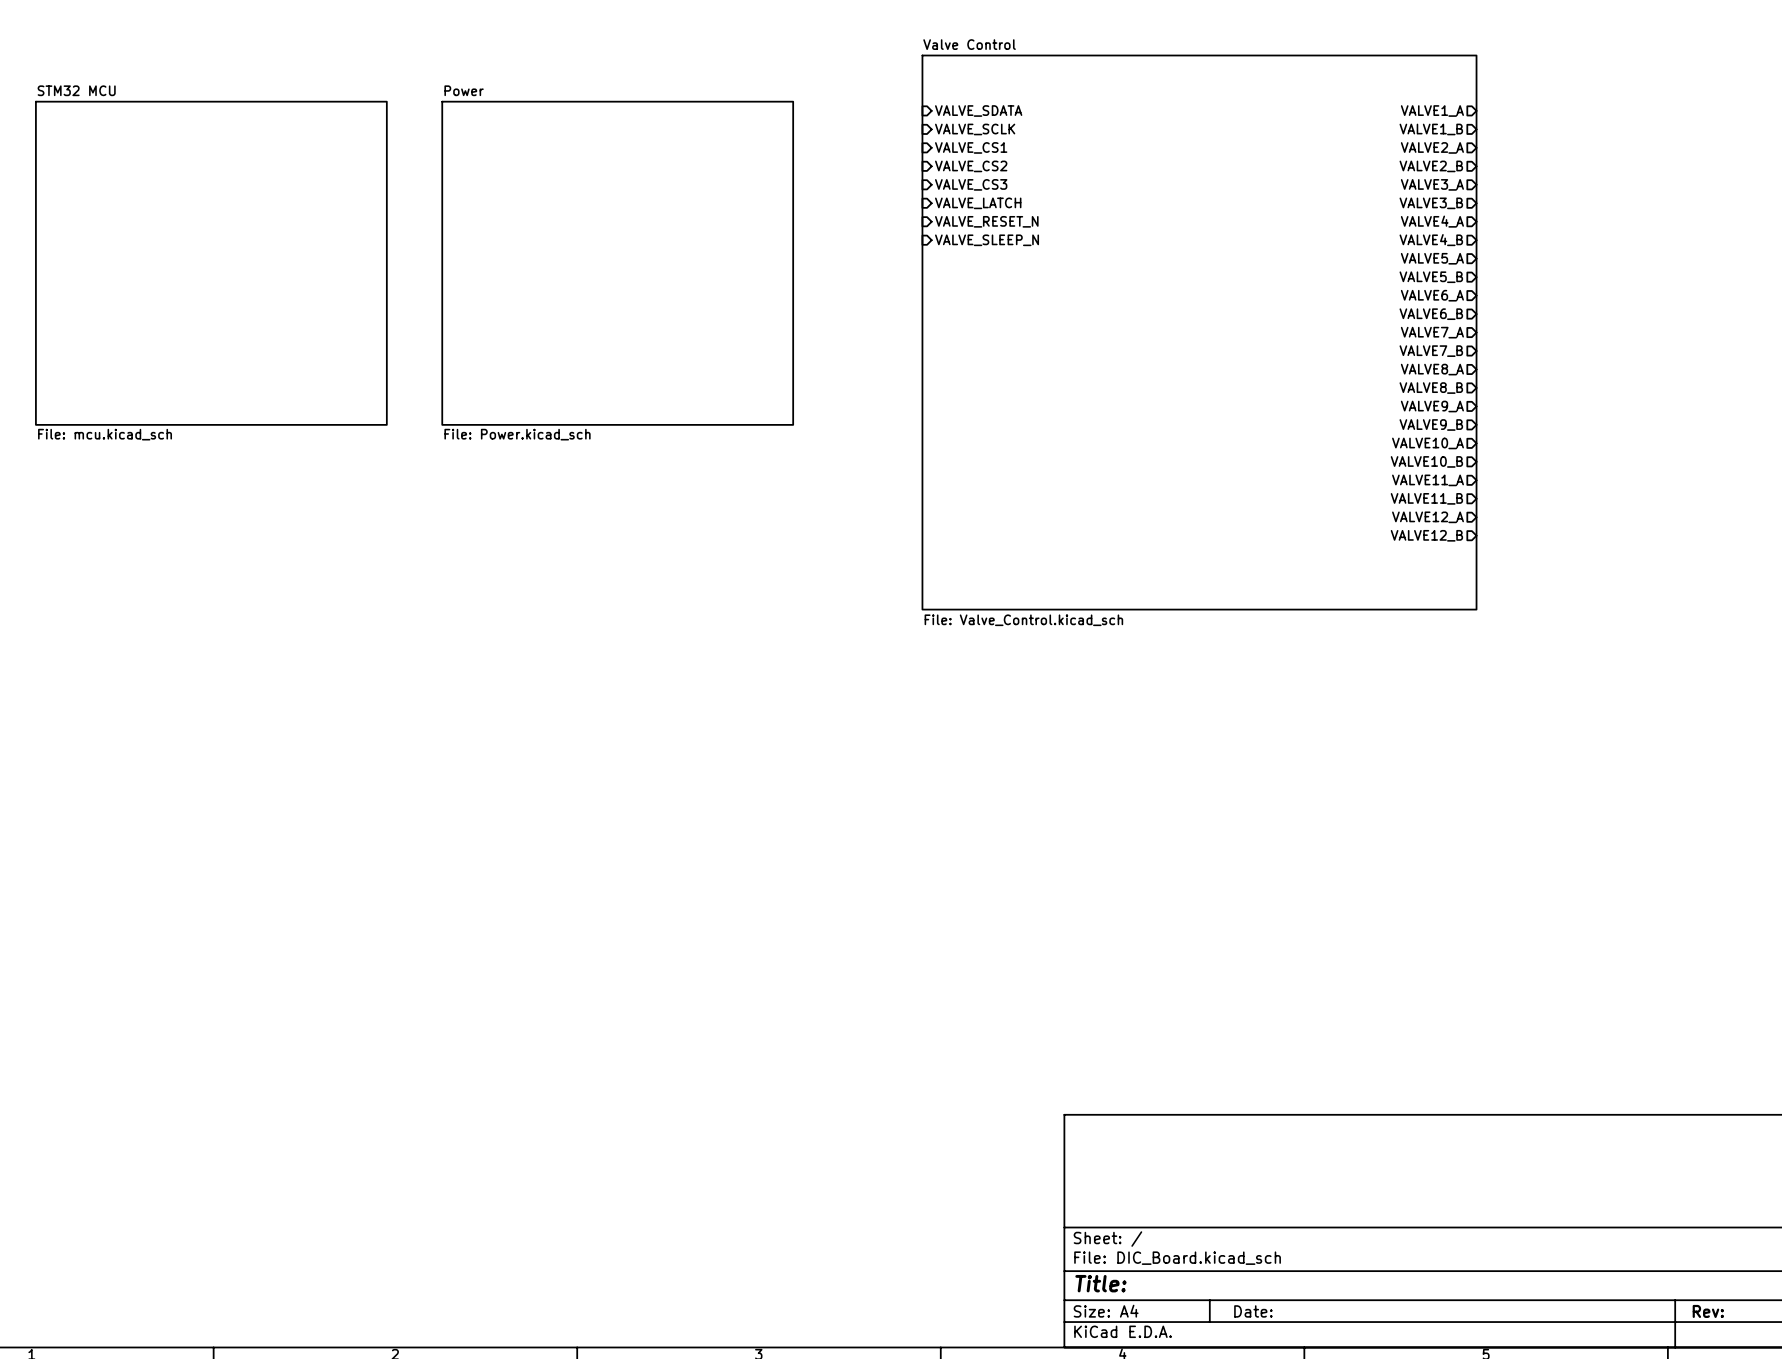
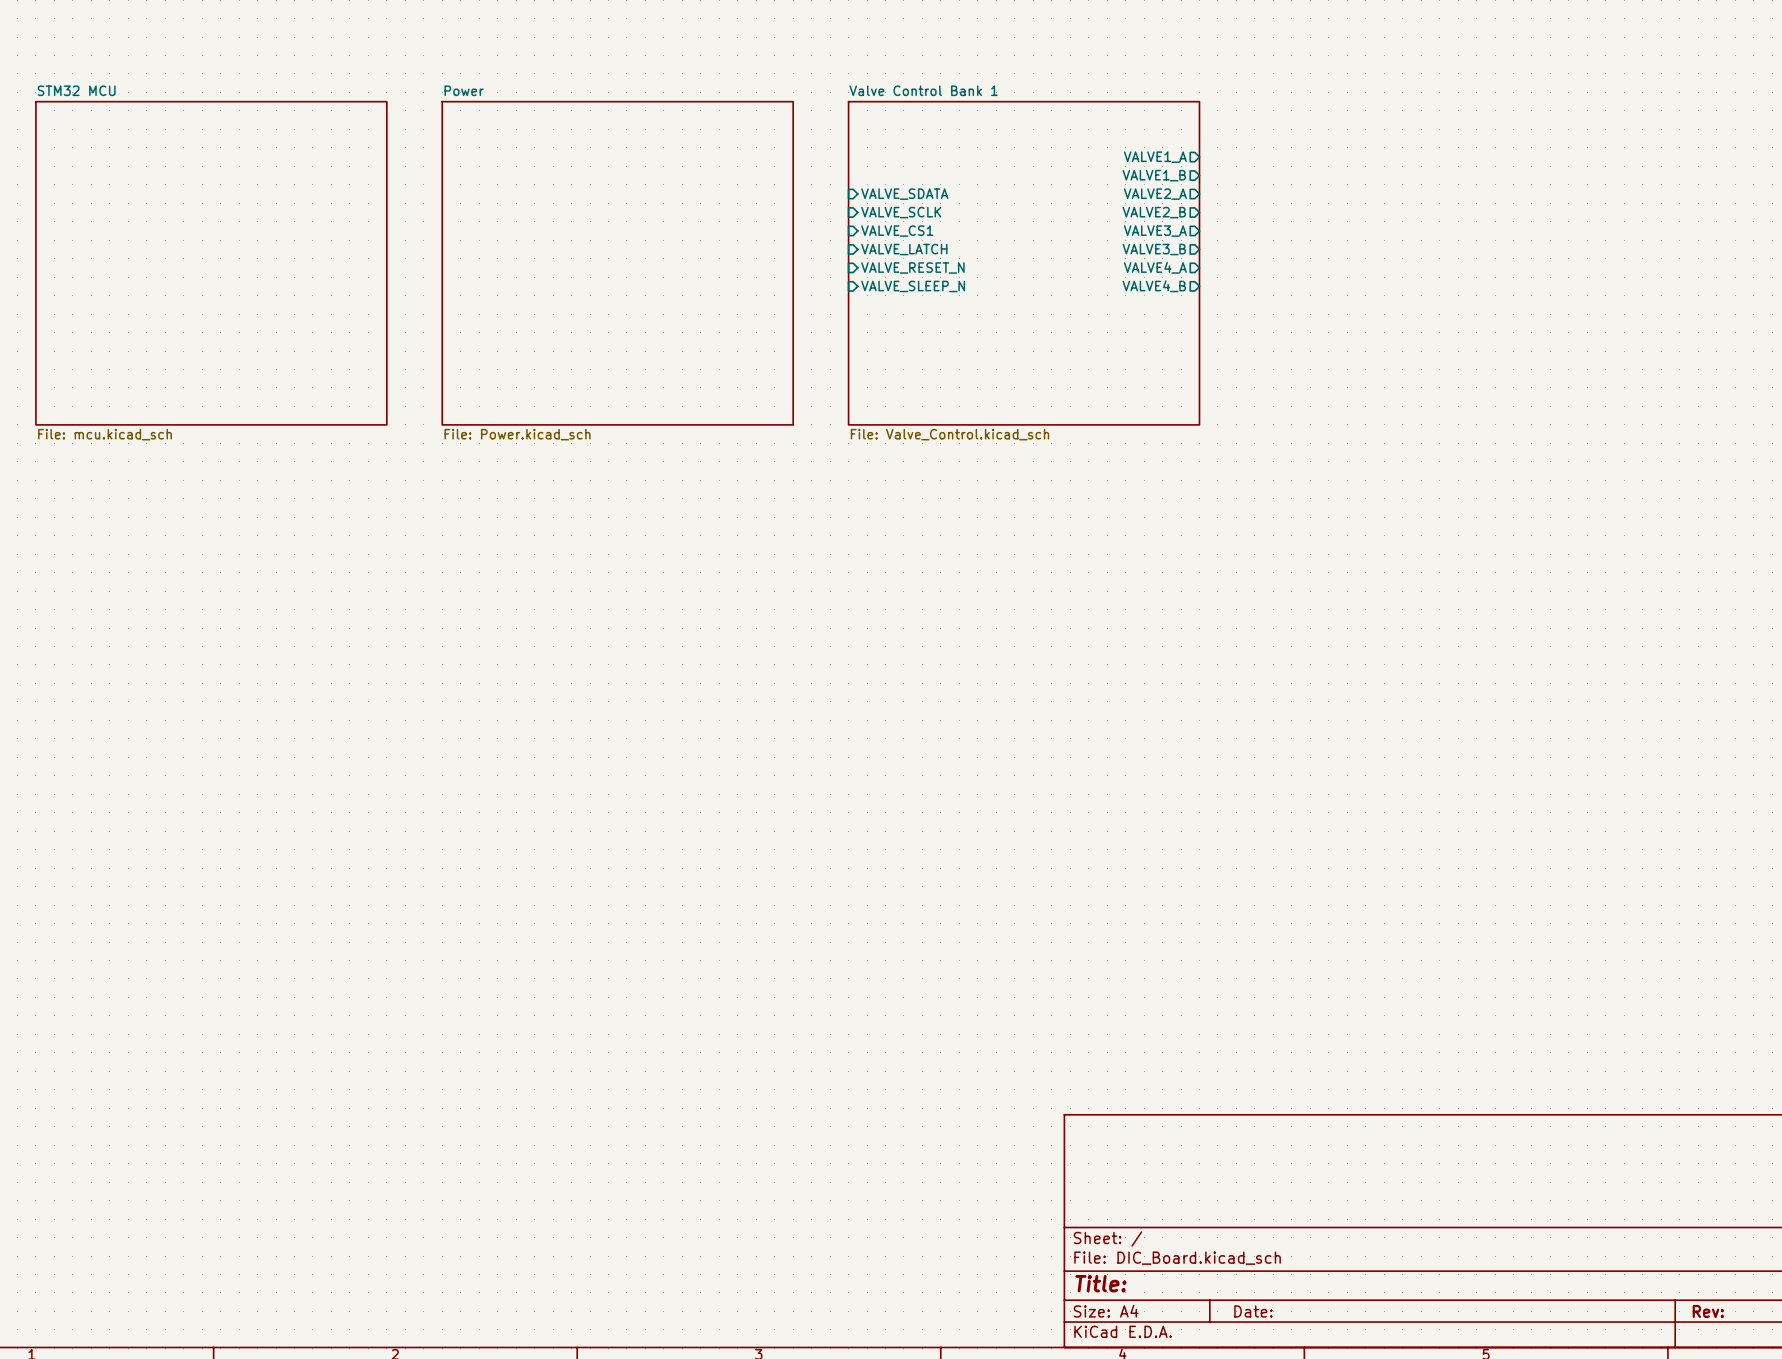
sheet pin position: VALVE_SDATA (978, 111) -> VALVE_SDATA (904, 194)
sheet pin: VALVE1_A (1432, 111) -> none
sheet pin position: VALVE_SCLK (975, 129) -> VALVE_SCLK (901, 212)
sheet pin: VALVE1_B (1431, 129) -> none
sheet pin position: VALVE_CS1 (971, 147) -> VALVE_CS1 (897, 231)
sheet pin: VALVE2_A (1432, 147) -> none
sheet pin: none -> VALVE1_A (1155, 157)
sheet pin: VALVE_CS2 (971, 166) -> none
sheet pin: VALVE2_B (1431, 166) -> none
sheet pin: none -> VALVE1_B (1154, 175)
sheet pin: VALVE_CS3 (971, 184) -> none
sheet pin: VALVE3_A (1432, 184) -> none
sheet pin: none -> VALVE2_A (1155, 194)
sheet pin position: VALVE_LATCH (978, 203) -> VALVE_LATCH (904, 249)
sheet pin: VALVE3_B (1431, 203) -> none
sheet pin: none -> VALVE2_B (1154, 212)
sheet pin position: VALVE_RESET_N (986, 221) -> VALVE_RESET_N (912, 267)
sheet pin: VALVE4_A (1432, 221) -> none
sheet pin: none -> VALVE3_A (1155, 231)
sheet pin position: VALVE_SLEEP_N (987, 240) -> VALVE_SLEEP_N (913, 286)
sheet pin: VALVE4_B (1431, 240) -> none
sheet pin: none -> VALVE3_B (1154, 249)
sheet pin: VALVE5_A (1432, 258) -> none
sheet Valve Control Bank 1: none -> File: Valve_Control.kicad_sch (1024, 263)
sheet pin: none -> VALVE4_A (1155, 267)
sheet pin: VALVE5_B (1431, 277) -> none
sheet pin: none -> VALVE4_B (1154, 286)
sheet pin: VALVE6_A (1432, 295) -> none
sheet pin: VALVE6_B (1431, 314) -> none
sheet Valve Control: File: Valve_Control.kicad_sch (1199, 332) -> none
sheet pin: VALVE7_A (1432, 332) -> none
sheet pin: VALVE7_B (1431, 351) -> none
sheet pin: VALVE8_A (1432, 369) -> none
sheet pin: VALVE8_B (1431, 388) -> none
sheet pin: VALVE9_A (1432, 406) -> none
sheet pin: VALVE9_B (1431, 424) -> none
sheet pin: VALVE10_A (1428, 443) -> none
sheet pin: VALVE10_B (1426, 461) -> none
sheet pin: VALVE11_A (1428, 480) -> none
sheet pin: VALVE11_B (1426, 498) -> none
sheet pin: VALVE12_A (1428, 517) -> none
sheet pin: VALVE12_B (1426, 535) -> none

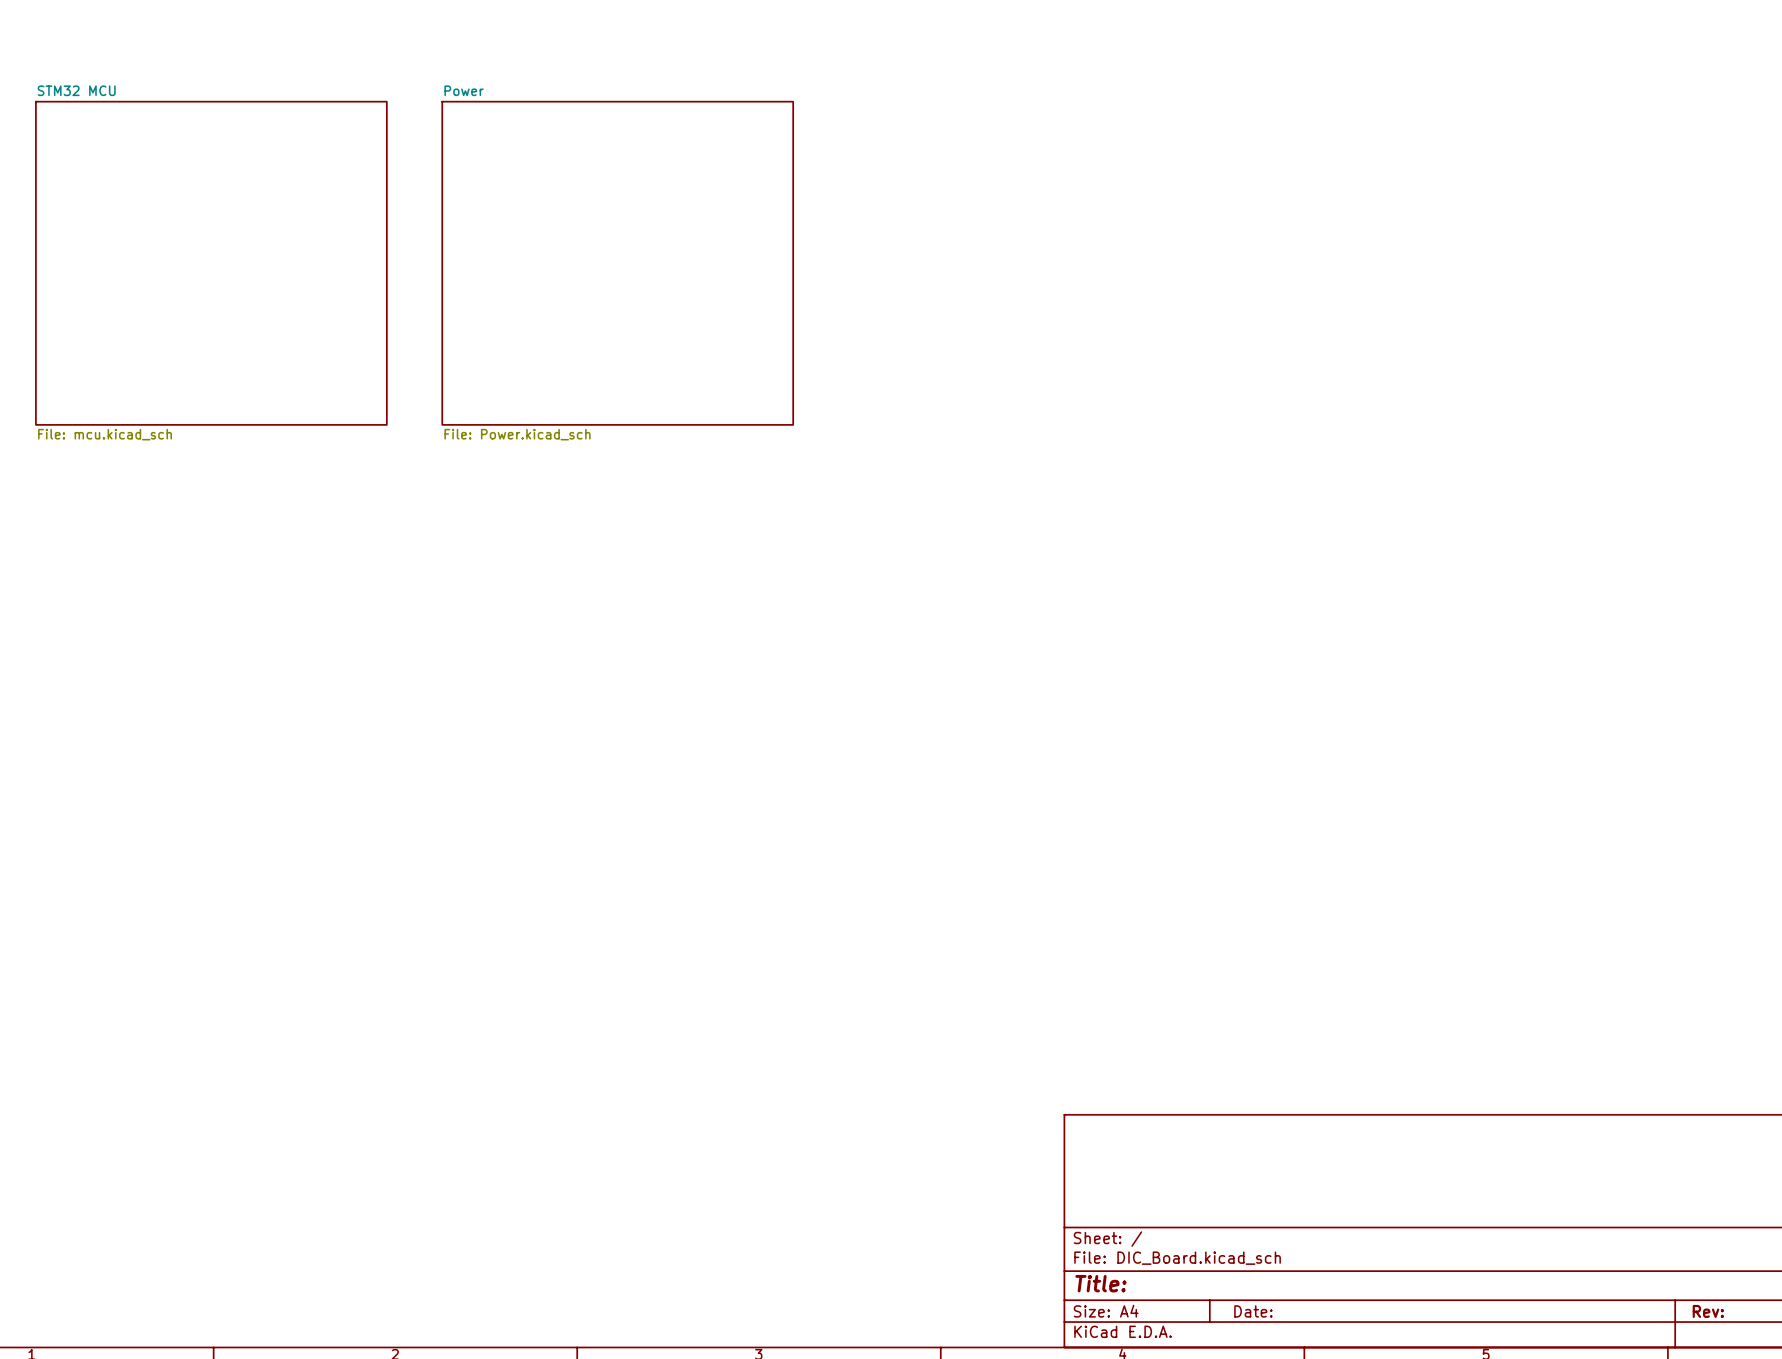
sheet pin: VALVE1_A (1155, 157) -> none
sheet pin: VALVE1_B (1154, 175) -> none
sheet pin: VALVE_SDATA (904, 194) -> none
sheet pin: VALVE2_A (1155, 194) -> none
sheet pin: VALVE_SCLK (901, 212) -> none
sheet pin: VALVE2_B (1154, 212) -> none
sheet pin: VALVE_CS1 (897, 231) -> none
sheet pin: VALVE3_A (1155, 231) -> none
sheet pin: VALVE_LATCH (904, 249) -> none
sheet pin: VALVE3_B (1154, 249) -> none
sheet Valve Control Bank 1: File: Valve_Control.kicad_sch (1024, 263) -> none
sheet pin: VALVE_RESET_N (912, 267) -> none
sheet pin: VALVE4_A (1155, 267) -> none
sheet pin: VALVE_SLEEP_N (913, 286) -> none
sheet pin: VALVE4_B (1154, 286) -> none

